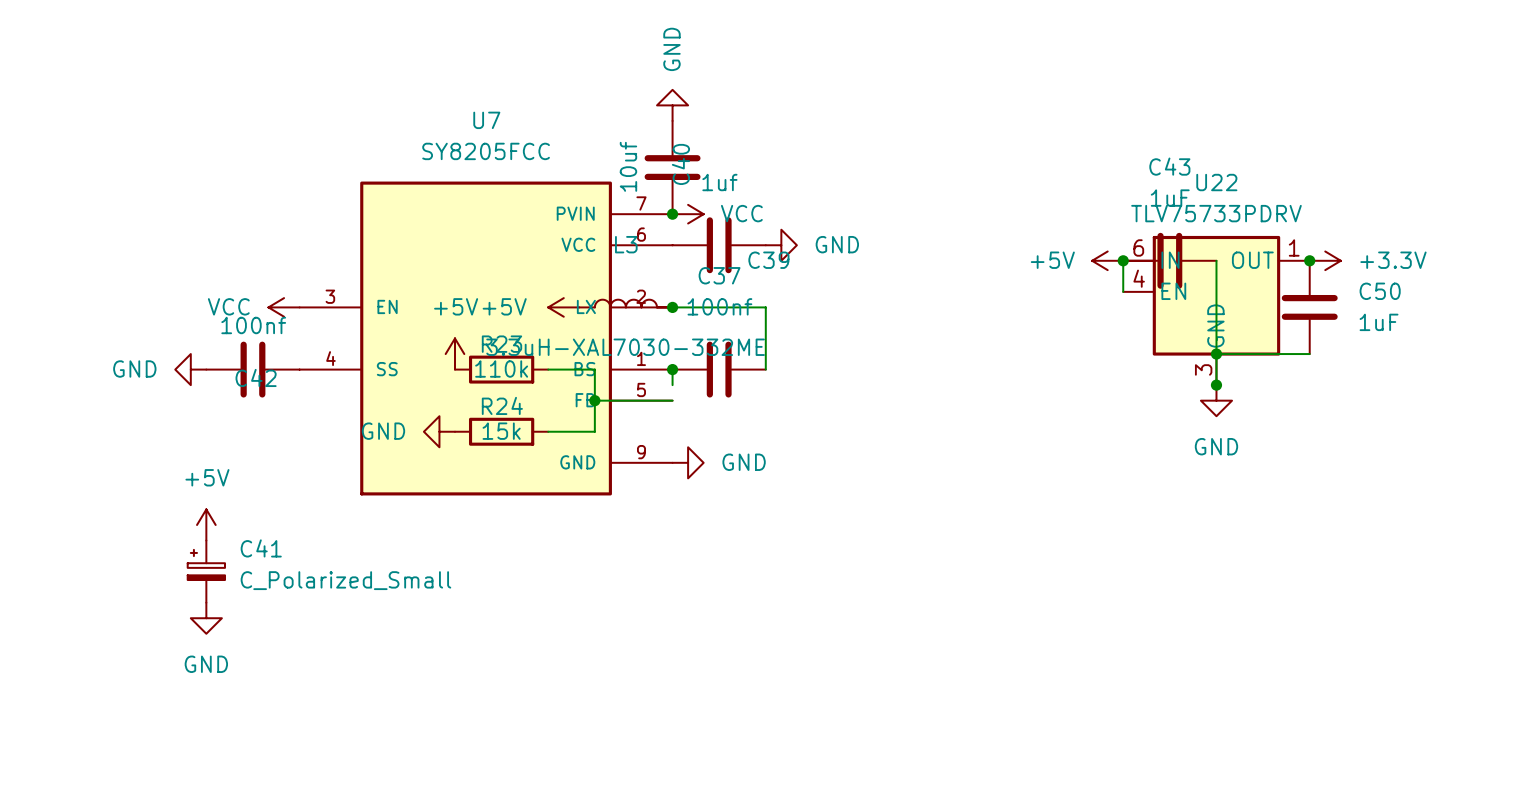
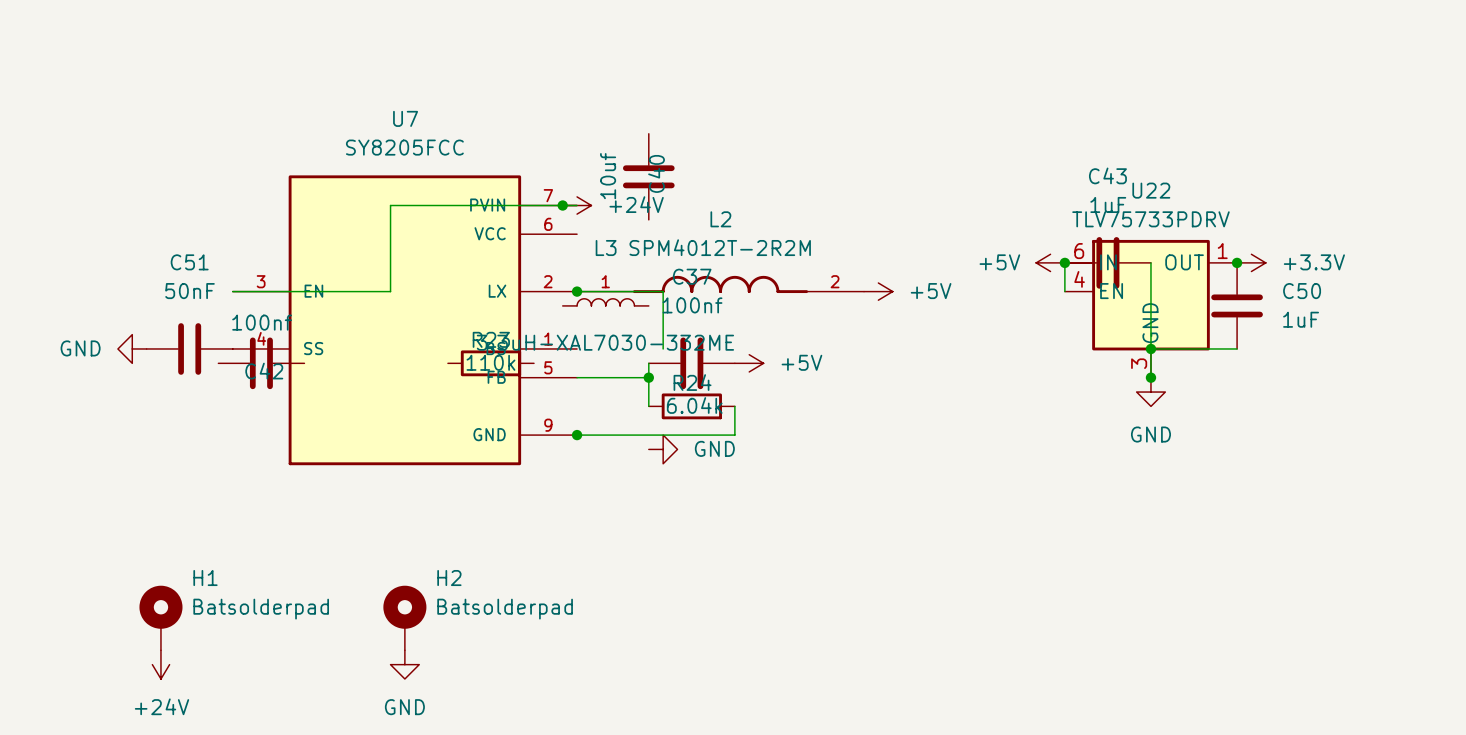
power symbol: GND (672, 105) -> none
junction: none -> (562, 205)
power symbol: none -> +24V (577, 205)
junction: (672, 214) -> none
power symbol: VCC (688, 214) -> none
C39: 1uf (719, 245) -> none
power symbol: GND (781, 245) -> none
L2: none -> SPM4012T-2R2M (720, 284)
junction: none -> (577, 291)
power symbol: none -> +5V (878, 291)
power symbol: VCC (284, 307) -> none
power symbol: +5V (563, 307) -> none
wire: (672, 307) (765, 307) (765, 369) -> (577, 291) (663, 291) (663, 348)
junction: (672, 307) -> none
U7 position: (486, 338) -> (404, 320)
C51: none -> 50nF (189, 348)
power symbol: +5V (454, 354) -> none
power symbol position: GND (190, 369) -> GND (132, 348)
wire: (548, 369) (594, 369) (594, 431) (548, 431) -> none
junction position: (672, 369) -> (648, 377)
power symbol: none -> +5V (749, 363)
wire: none -> (577, 377) (648, 377) (648, 406)
wire: (594, 400) (672, 400) -> none
junction: (594, 400) -> none
wire: none -> (734, 406) (734, 435) (577, 435)
power symbol: GND (439, 431) -> none
R24 position: (501, 431) -> (691, 406)
R24 value: 15k (501, 431) -> 6.04k (694, 405)
junction: none -> (577, 435)
power symbol: +5V (206, 524) -> none
C41: C_Polarized_Small (206, 571) -> none
power symbol: GND (206, 618) -> none
H1: none -> Batsolderpad (160, 618)
H2: none -> Batsolderpad (404, 618)
power symbol: none -> +24V (160, 664)
power symbol: none -> GND (404, 664)

